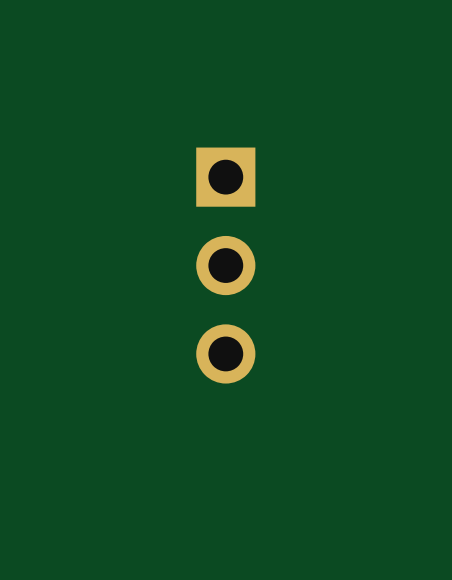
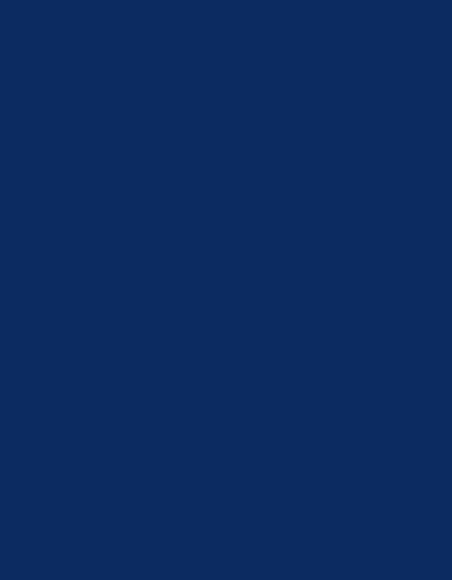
part: (225, 265) -> none

